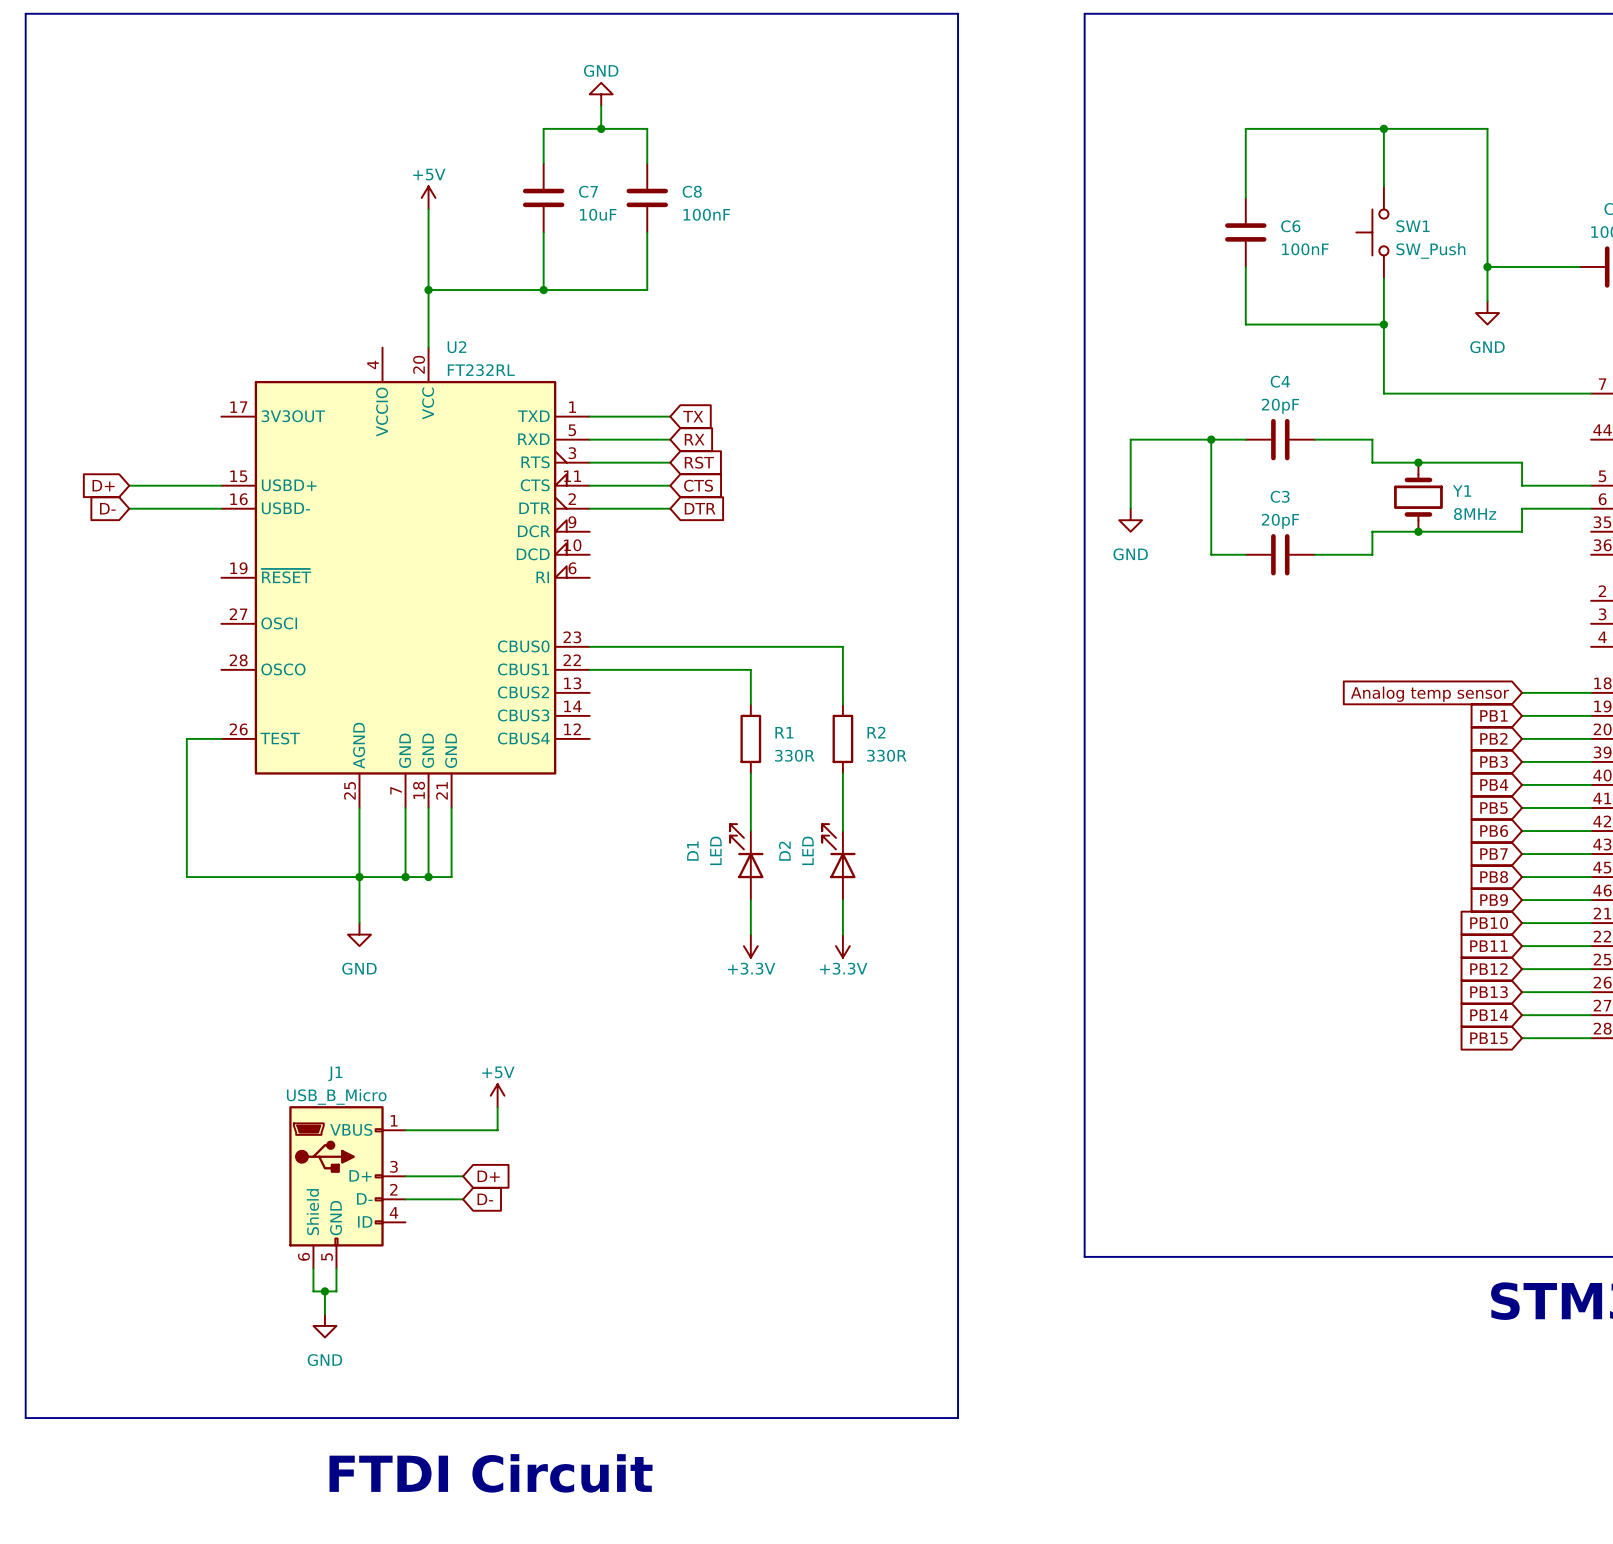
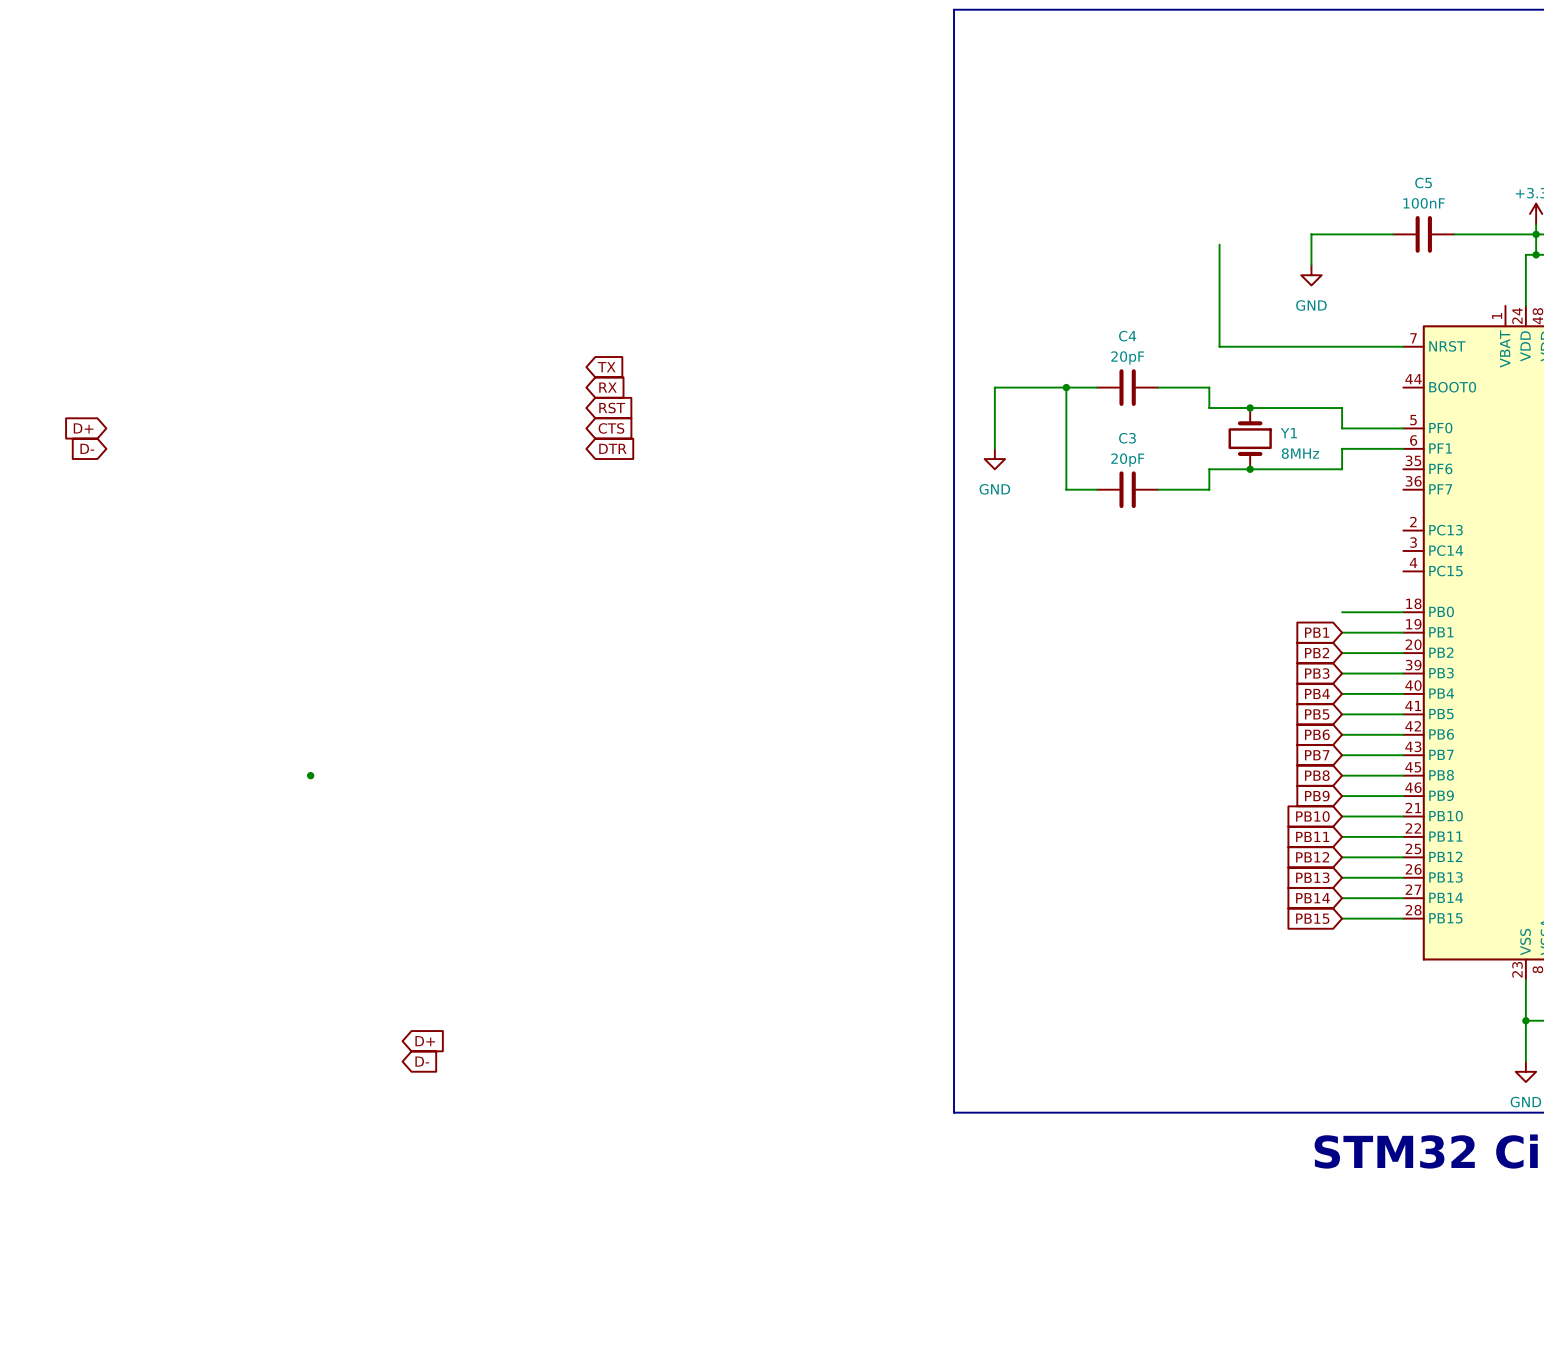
line: (25, 13) (958, 13) (958, 1418) (25, 1418) (25, 13) -> none
power symbol: GND (601, 94) -> none
wire: (601, 105) (601, 128) -> none
junction: (601, 128) -> none
wire: (1383, 128) (1383, 186) -> none
junction: (1383, 128) -> none
wire: (543, 163) (543, 128) (647, 128) (647, 163) -> none
power symbol: +5V (428, 197) -> none
C7: 10uF (543, 197) -> none
C8: 100nF (647, 197) -> none
wire: (1245, 197) (1245, 128) (1487, 128) (1487, 267) -> none
wire: (428, 209) (428, 347) -> none
wire: (543, 232) (543, 290) -> none
wire: (647, 232) (647, 290) (428, 290) -> none
C6: 100nF (1245, 232) -> none
SW1: SW_Push (1372, 232) -> none
wire: (1245, 267) (1245, 324) (1383, 324) -> none
junction: (1487, 267) -> none
junction: (428, 290) -> none
junction: (543, 290) -> none
junction: (1383, 324) -> none
wire: (589, 416) (670, 416) -> none
wire: (589, 439) (670, 439) -> none
wire: (589, 462) (670, 462) -> none
wire: (129, 485) (221, 485) -> none
wire: (589, 485) (670, 485) -> none
wire: (129, 508) (221, 508) -> none
wire: (589, 508) (670, 508) -> none
U2: FT232RL (405, 577) -> none
wire: (589, 646) (842, 646) (842, 704) -> none
wire: (589, 669) (750, 669) (750, 704) -> none
global label: Analog temp sensor (1430, 694) -> none
wire: (221, 738) (186, 738) (186, 877) (451, 877) (451, 807) -> none
R1: 330R (750, 738) -> none
R2: 330R (842, 738) -> none
wire: (750, 773) (750, 831) -> none
wire: (842, 773) (842, 831) -> none
wire: (359, 807) (359, 923) -> none
wire: (405, 807) (405, 877) -> none
wire: (428, 807) (428, 877) -> none
D1: LED (746, 862) -> none
D2: LED (838, 862) -> none
junction: (405, 877) -> none
junction: (428, 877) -> none
wire: (750, 900) (750, 934) -> none
wire: (842, 900) (842, 934) -> none
power symbol: GND (359, 934) -> none
power symbol: +3.3V (750, 946) -> none
power symbol: +3.3V (842, 946) -> none
power symbol: +5V (497, 1095) -> none
wire: (497, 1107) (497, 1130) (405, 1130) -> none
wire: (405, 1176) (463, 1176) -> none
J1: USB_B_Micro (347, 1187) -> none
wire: (405, 1199) (463, 1199) -> none
wire: (313, 1268) (313, 1291) (336, 1291) (336, 1268) -> none
wire: (324, 1291) (324, 1314) -> none
junction: (324, 1291) -> none
power symbol: GND (324, 1325) -> none
text: FTDI Circuit (491, 1473) -> none

